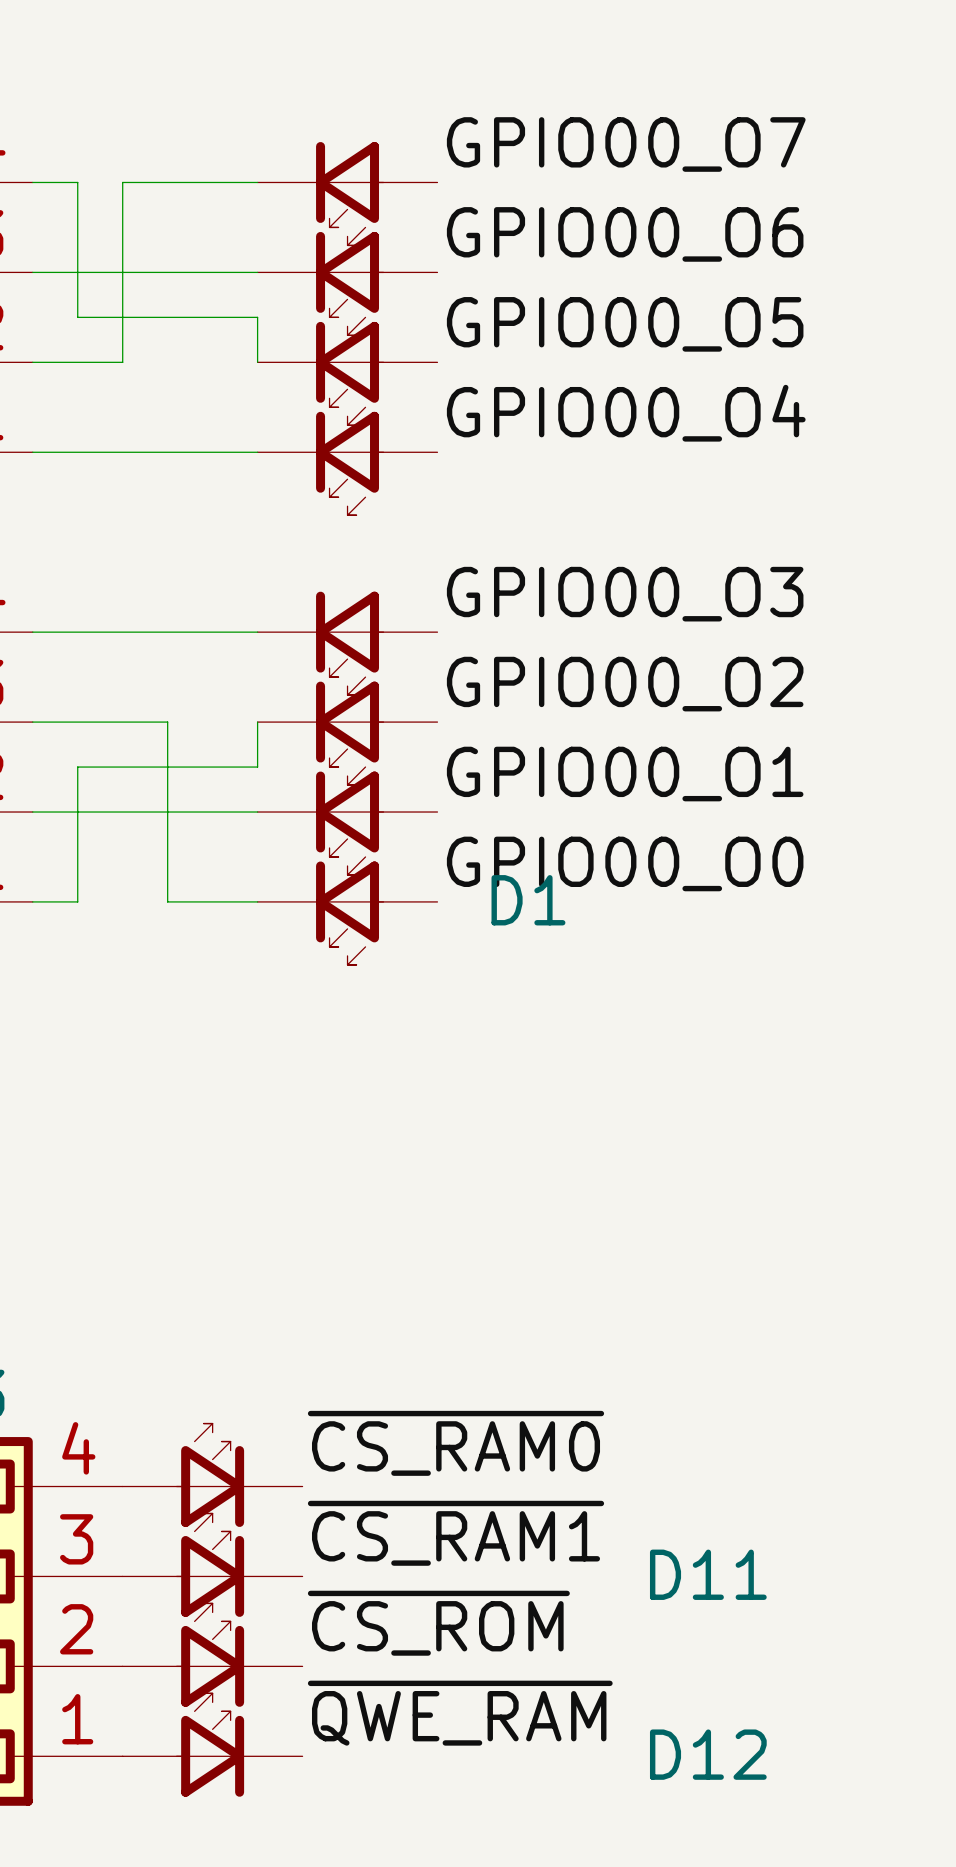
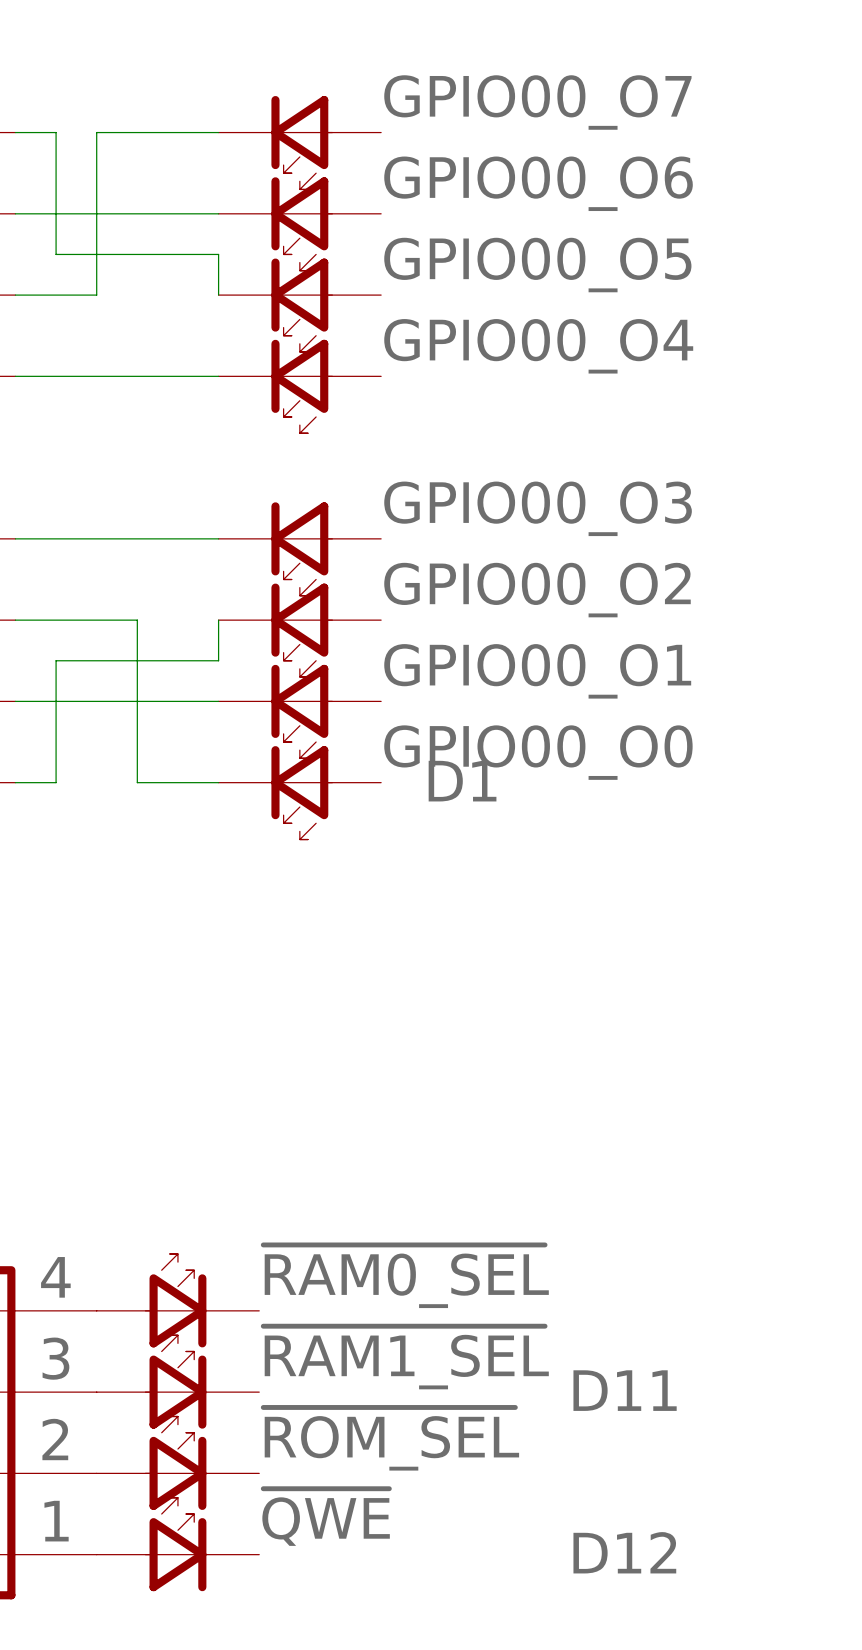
label: ~{CS_RAM0} (456, 1443) -> ~{RAM0_SEL} (406, 1276)
label: ~{CS_RAM1} (456, 1533) -> ~{RAM1_SEL} (406, 1357)
label: ~{CS_ROM} (438, 1623) -> ~{ROM_SEL} (391, 1439)
label: ~{QWE_RAM} (460, 1713) -> ~{QWE} (326, 1517)

